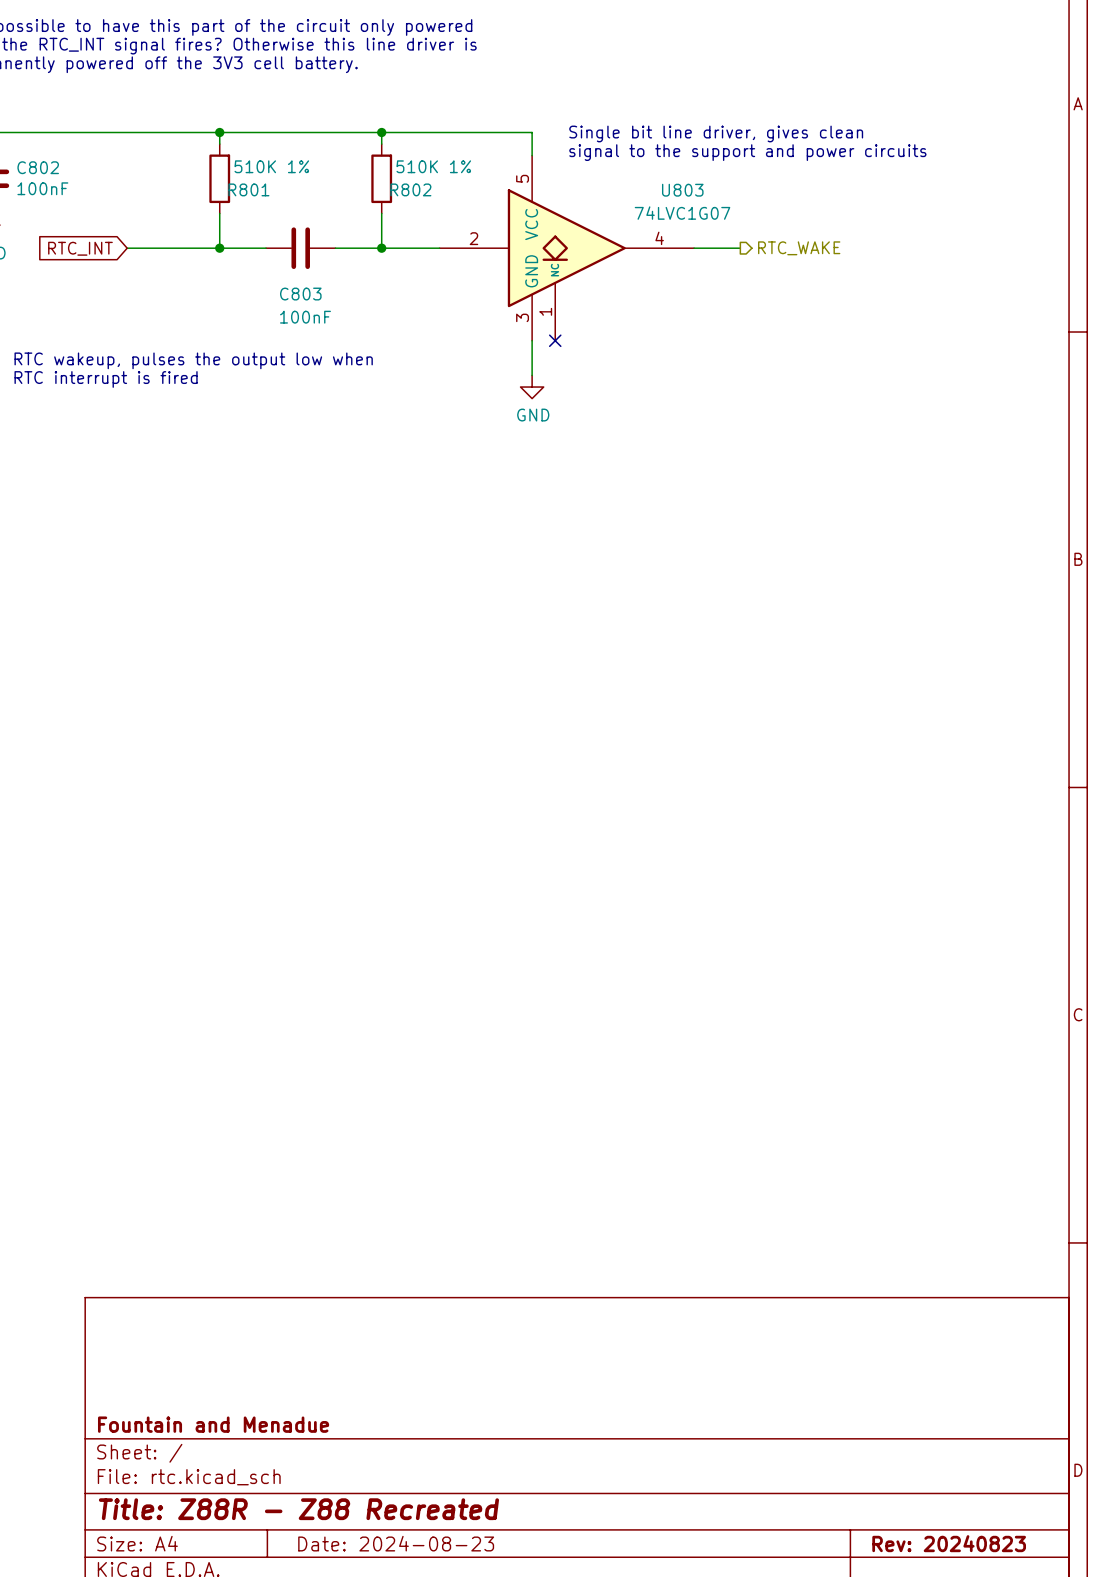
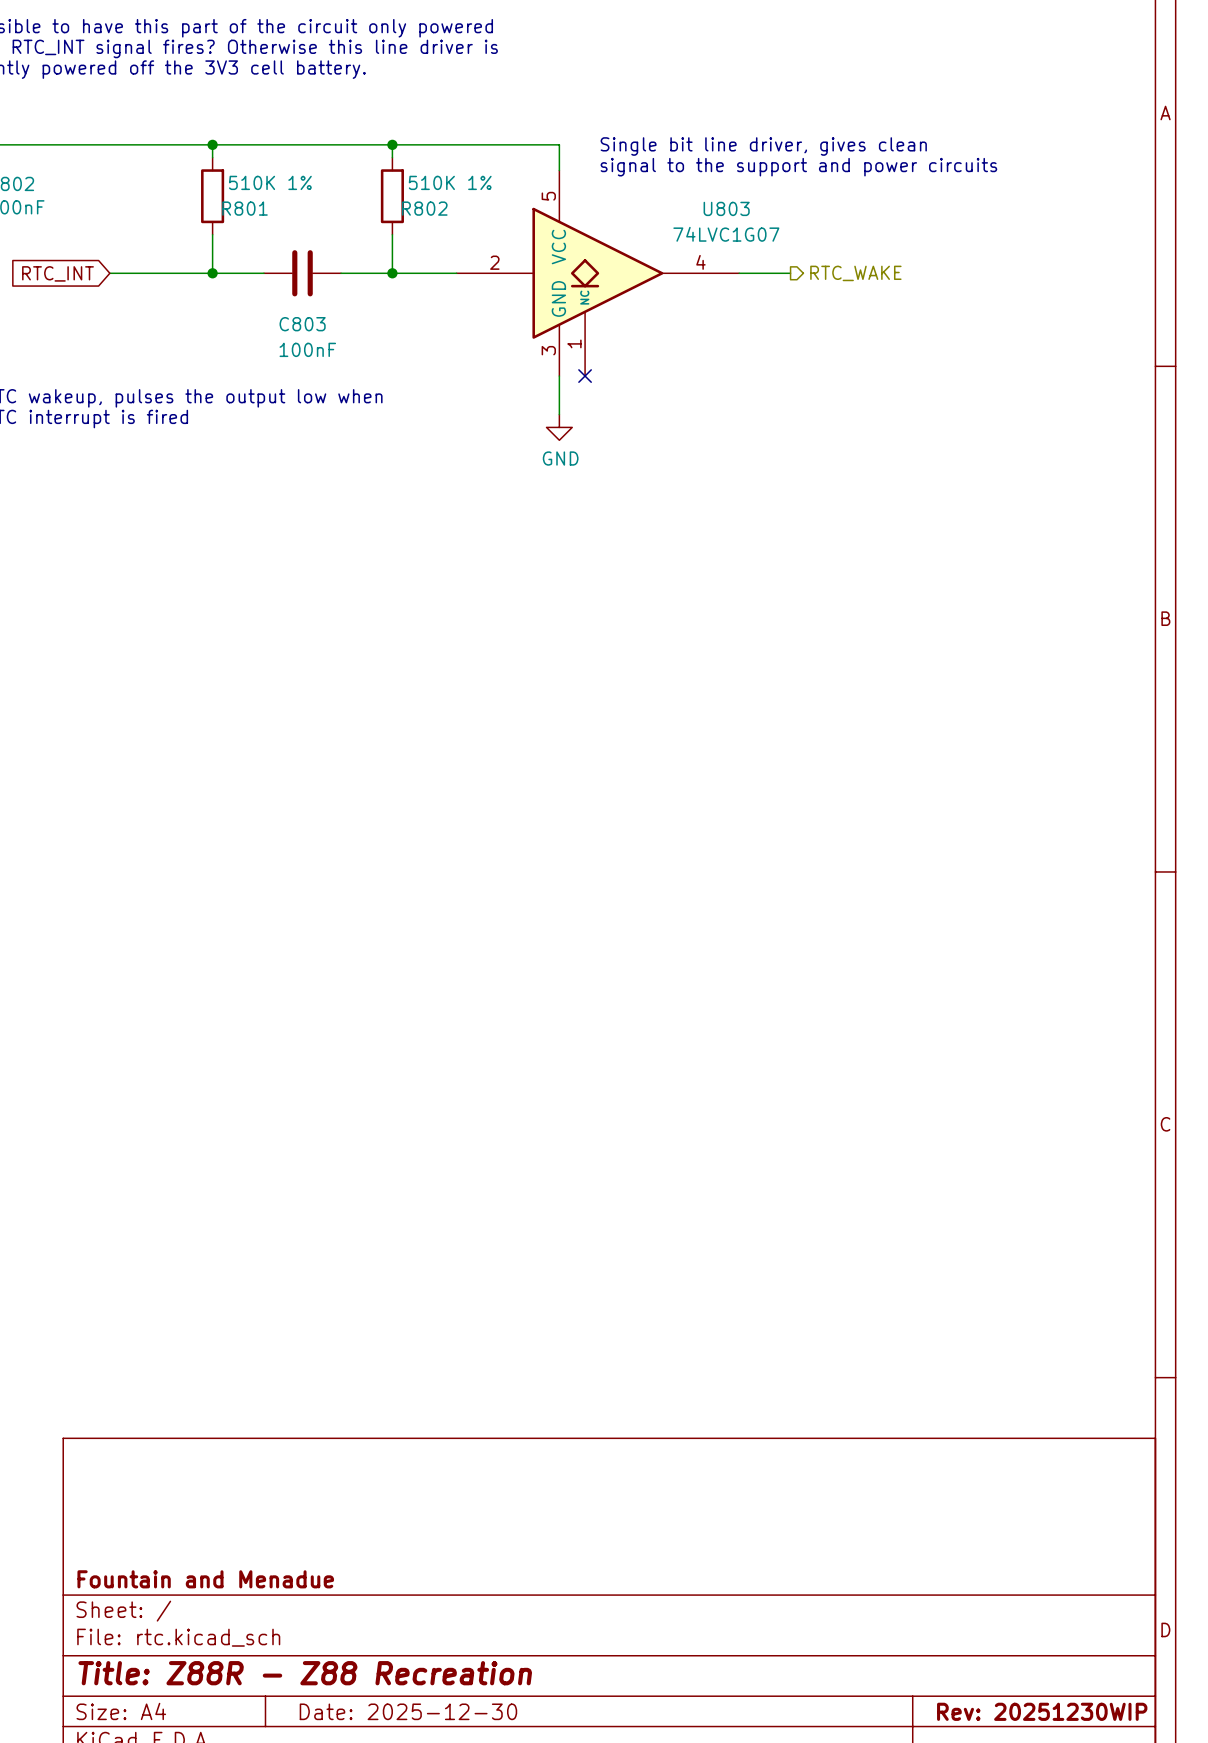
title block: Title: Z88R - Z88 Recreated (298, 1509) -> Title: Z88R - Z88 Recreation (305, 1673)
title block: Date: 2024-08-23 (396, 1543) -> Date: 2025-12-30 (408, 1711)
title block: Rev: 20240823 (949, 1543) -> Rev: 20251230WIP (1042, 1711)

